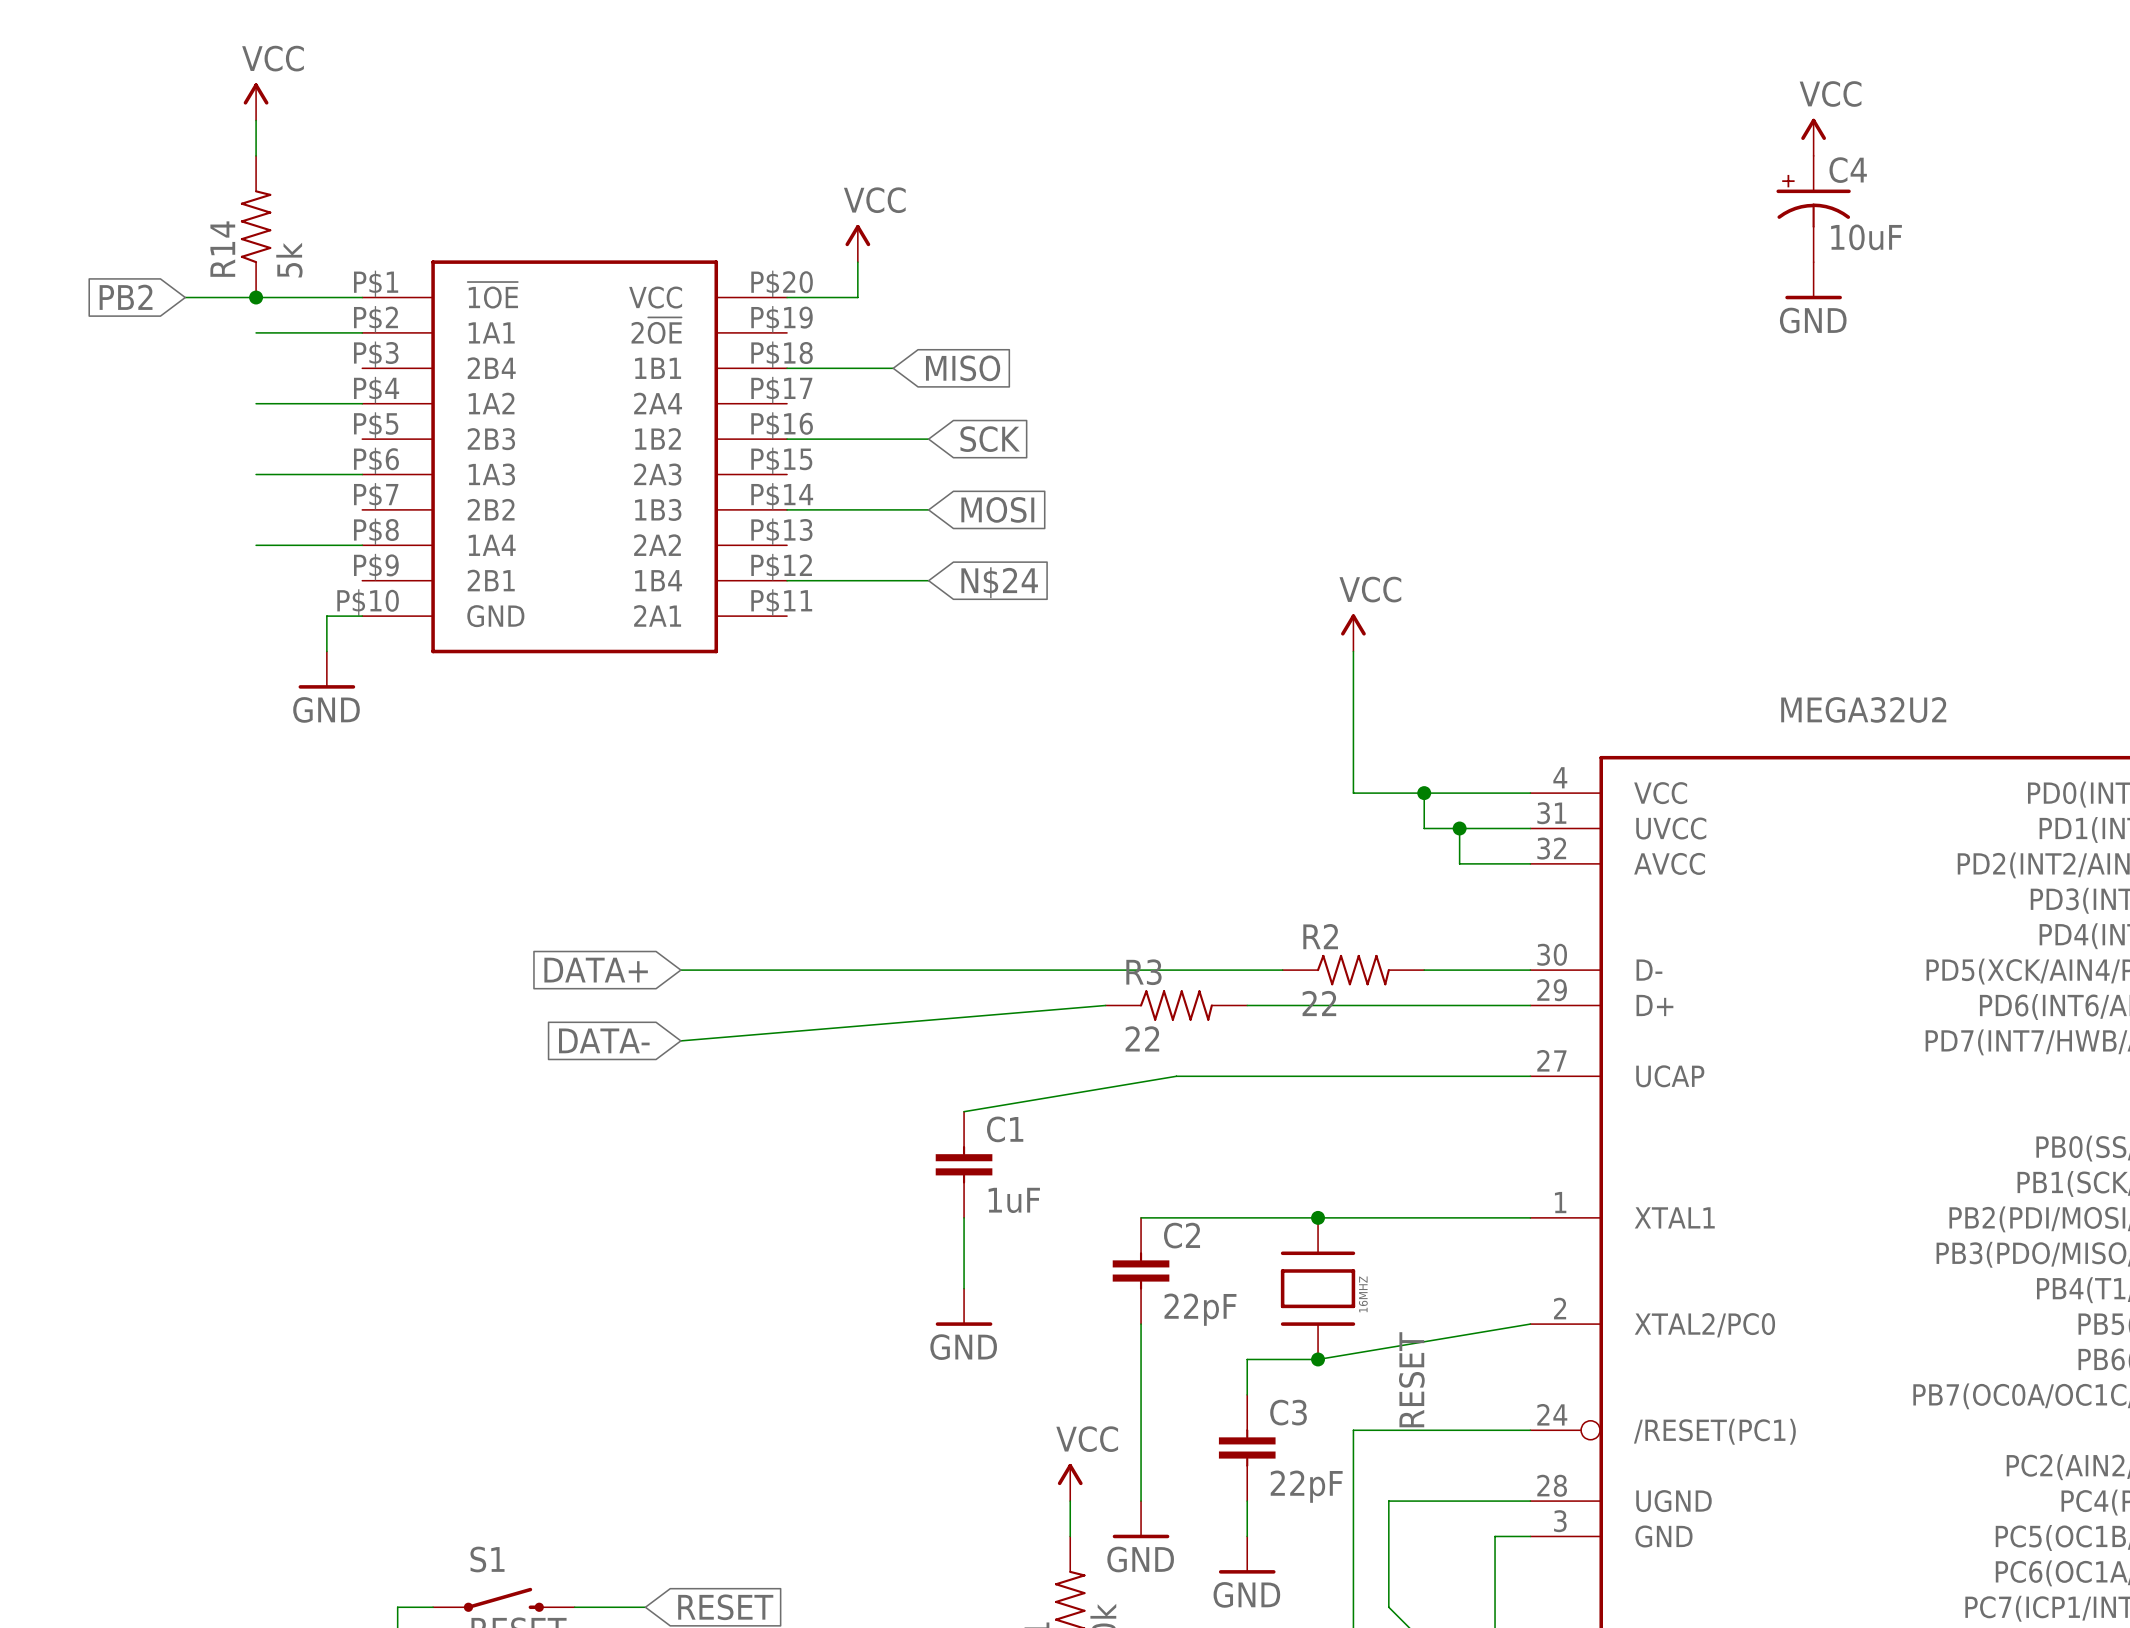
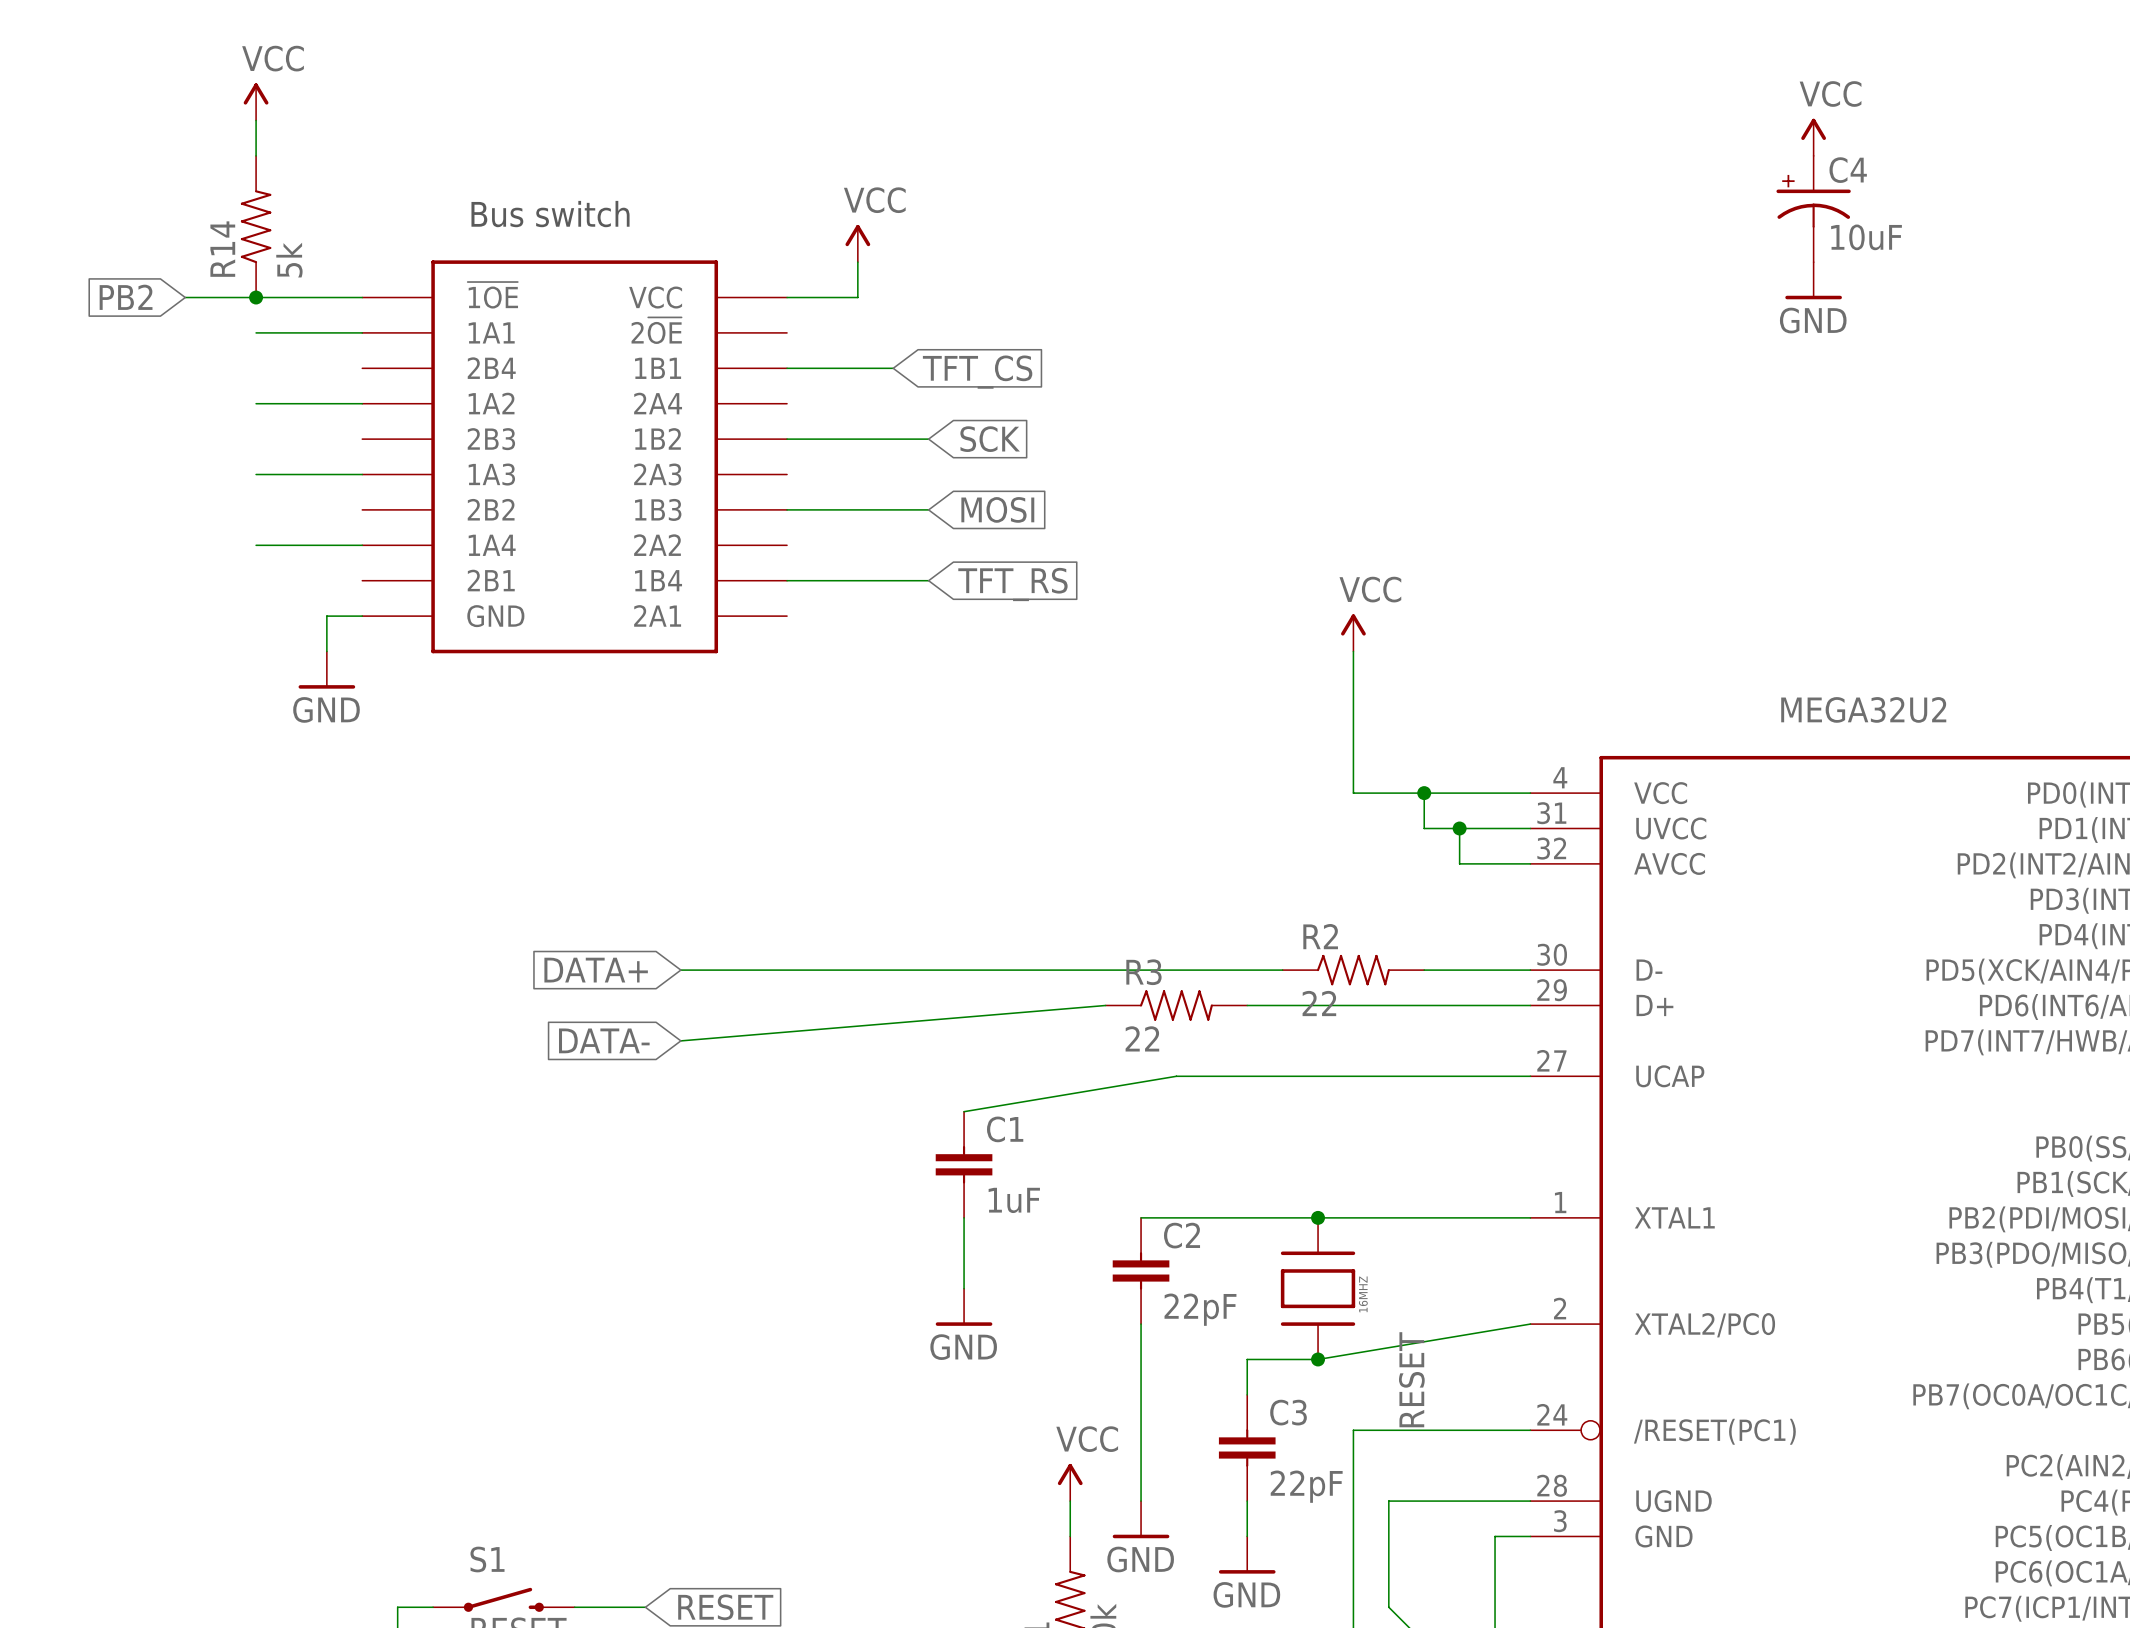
text: none -> Bus switch (550, 214)
part symbol: [362, 260, 788, 654] -> [362, 260, 788, 654]
global label: MISO (963, 368) -> TFT_CS (977, 372)
global label: N$24 (999, 582) -> TFT_RS (1012, 584)

